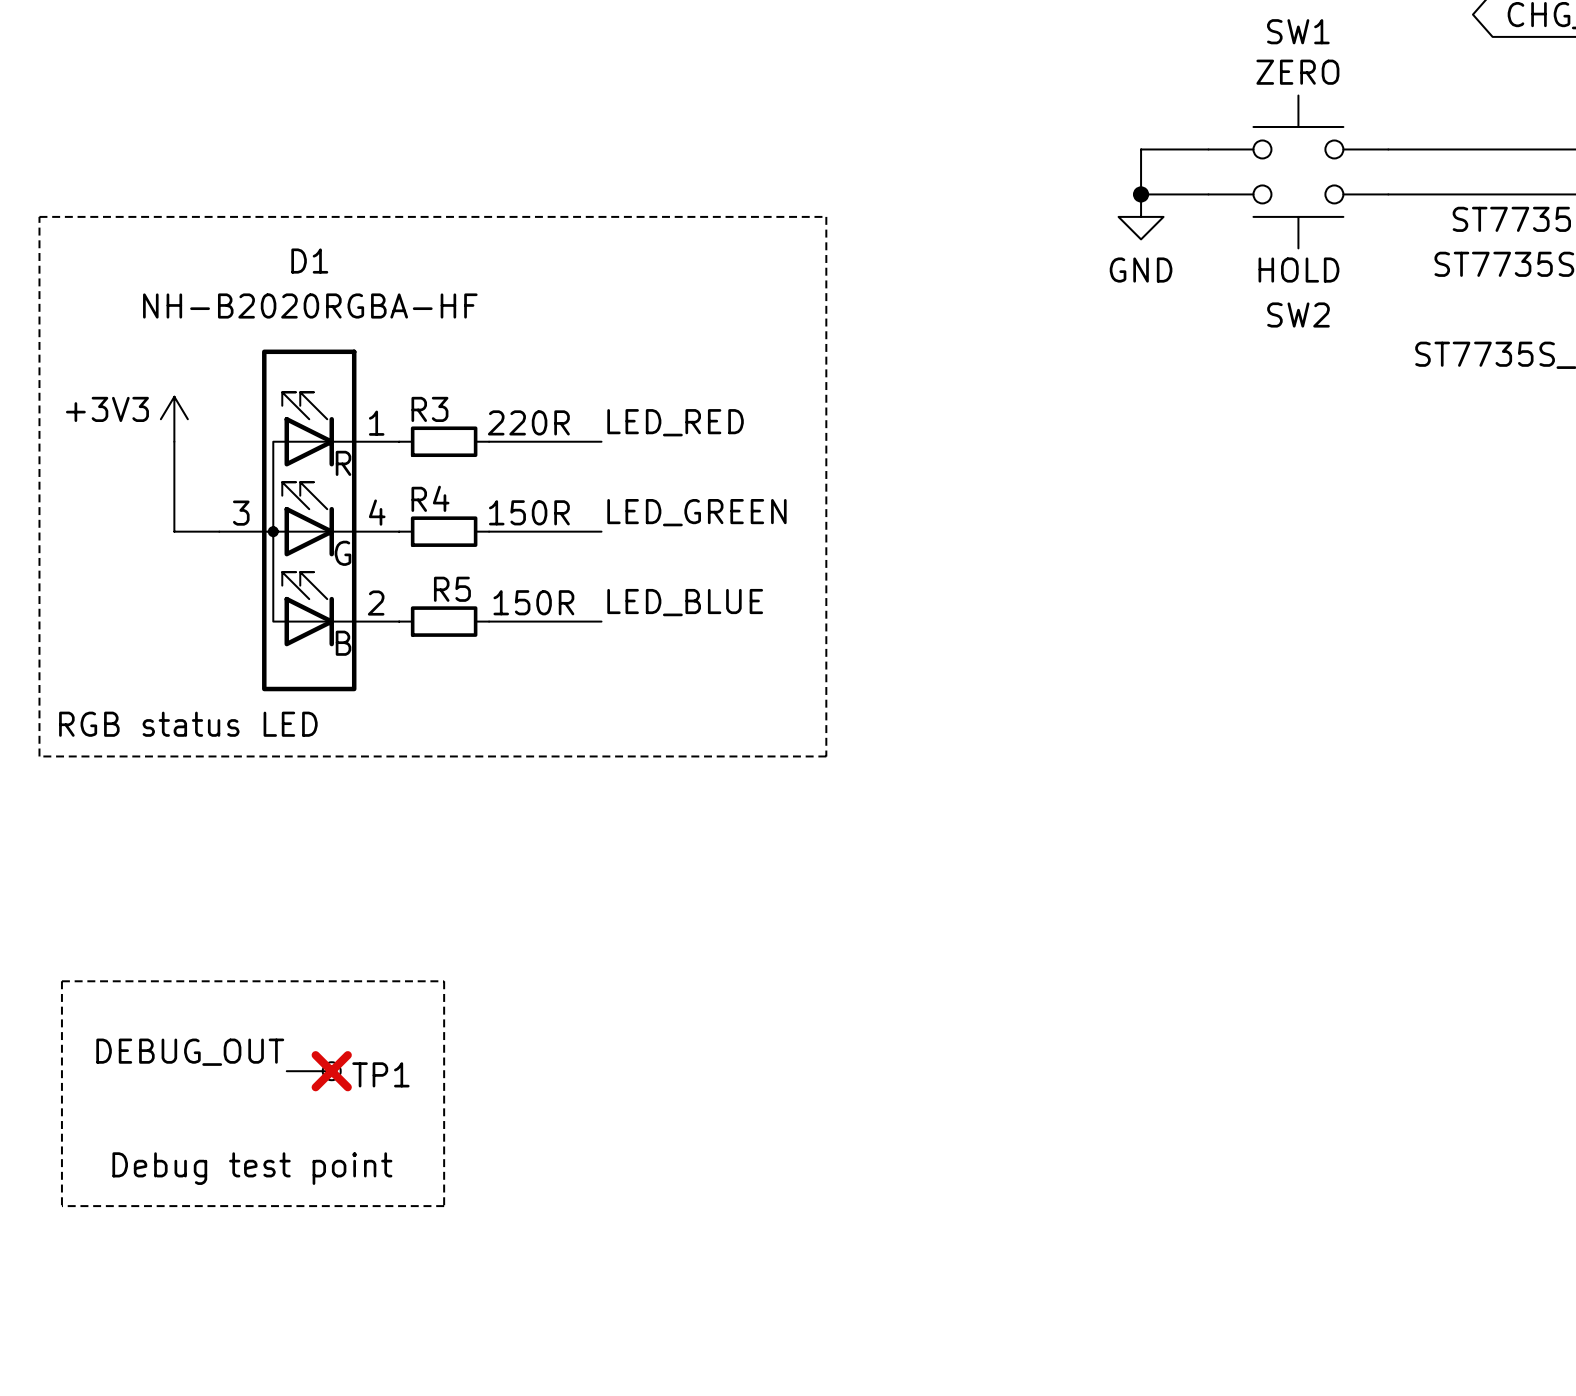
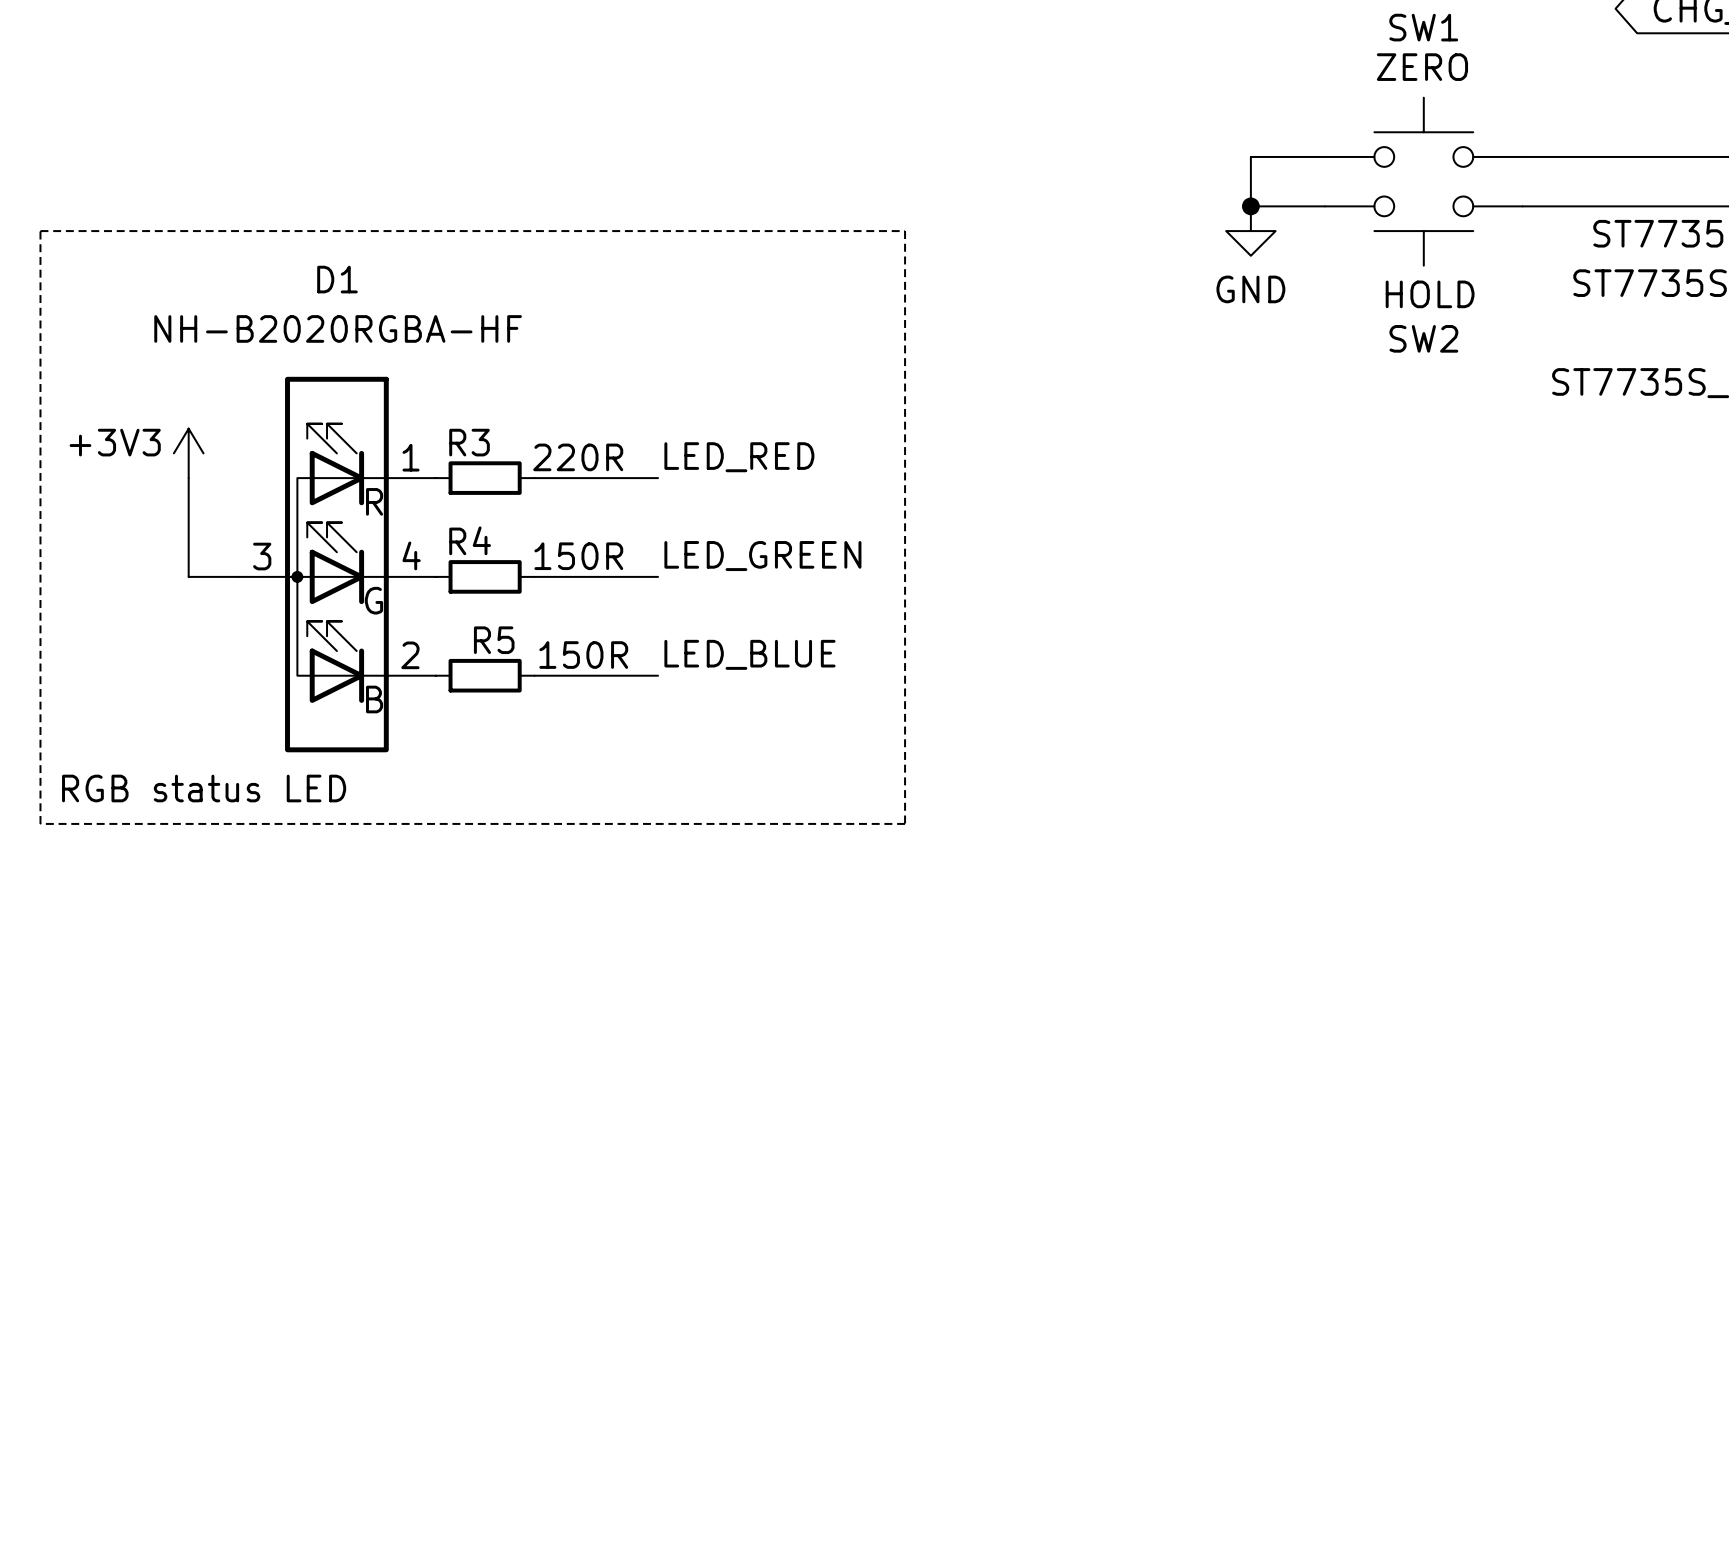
SW1 value: none -> ZERO (1422, 67)
SW1 text: ZERO (1297, 72) -> none
SW2 text: HOLD (1298, 270) -> none
SW2 value: none -> HOLD (1430, 294)
line: (61, 981) (444, 981) (444, 1206) (61, 1206) (61, 981) -> none
label: DEBUG_OUT (190, 1052) -> none
wire: (286, 1071) (331, 1071) -> none
TP1: (331, 1071) -> none
text: Debug test point (252, 1168) -> none

